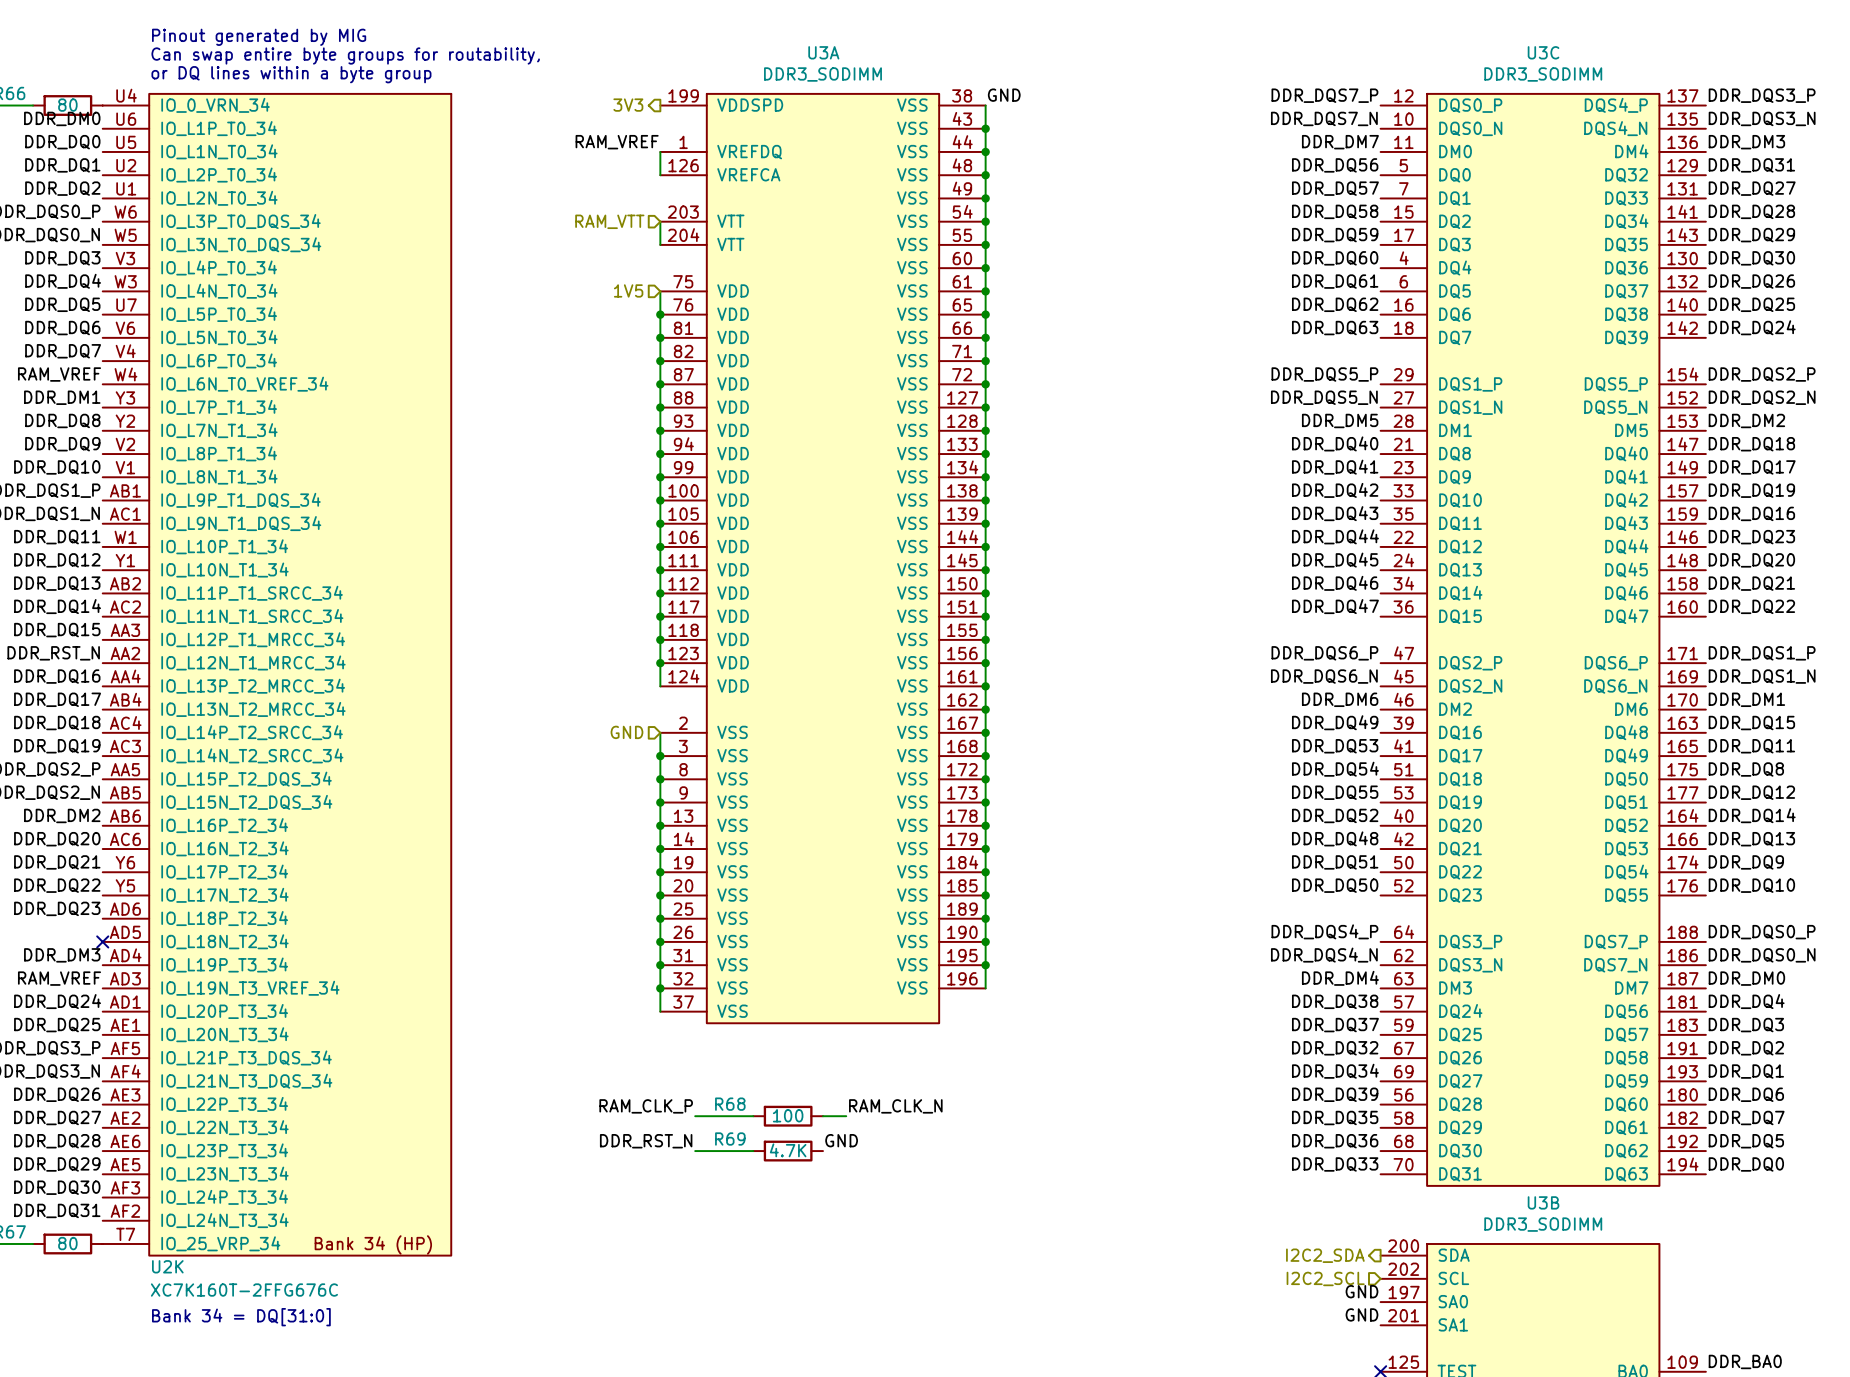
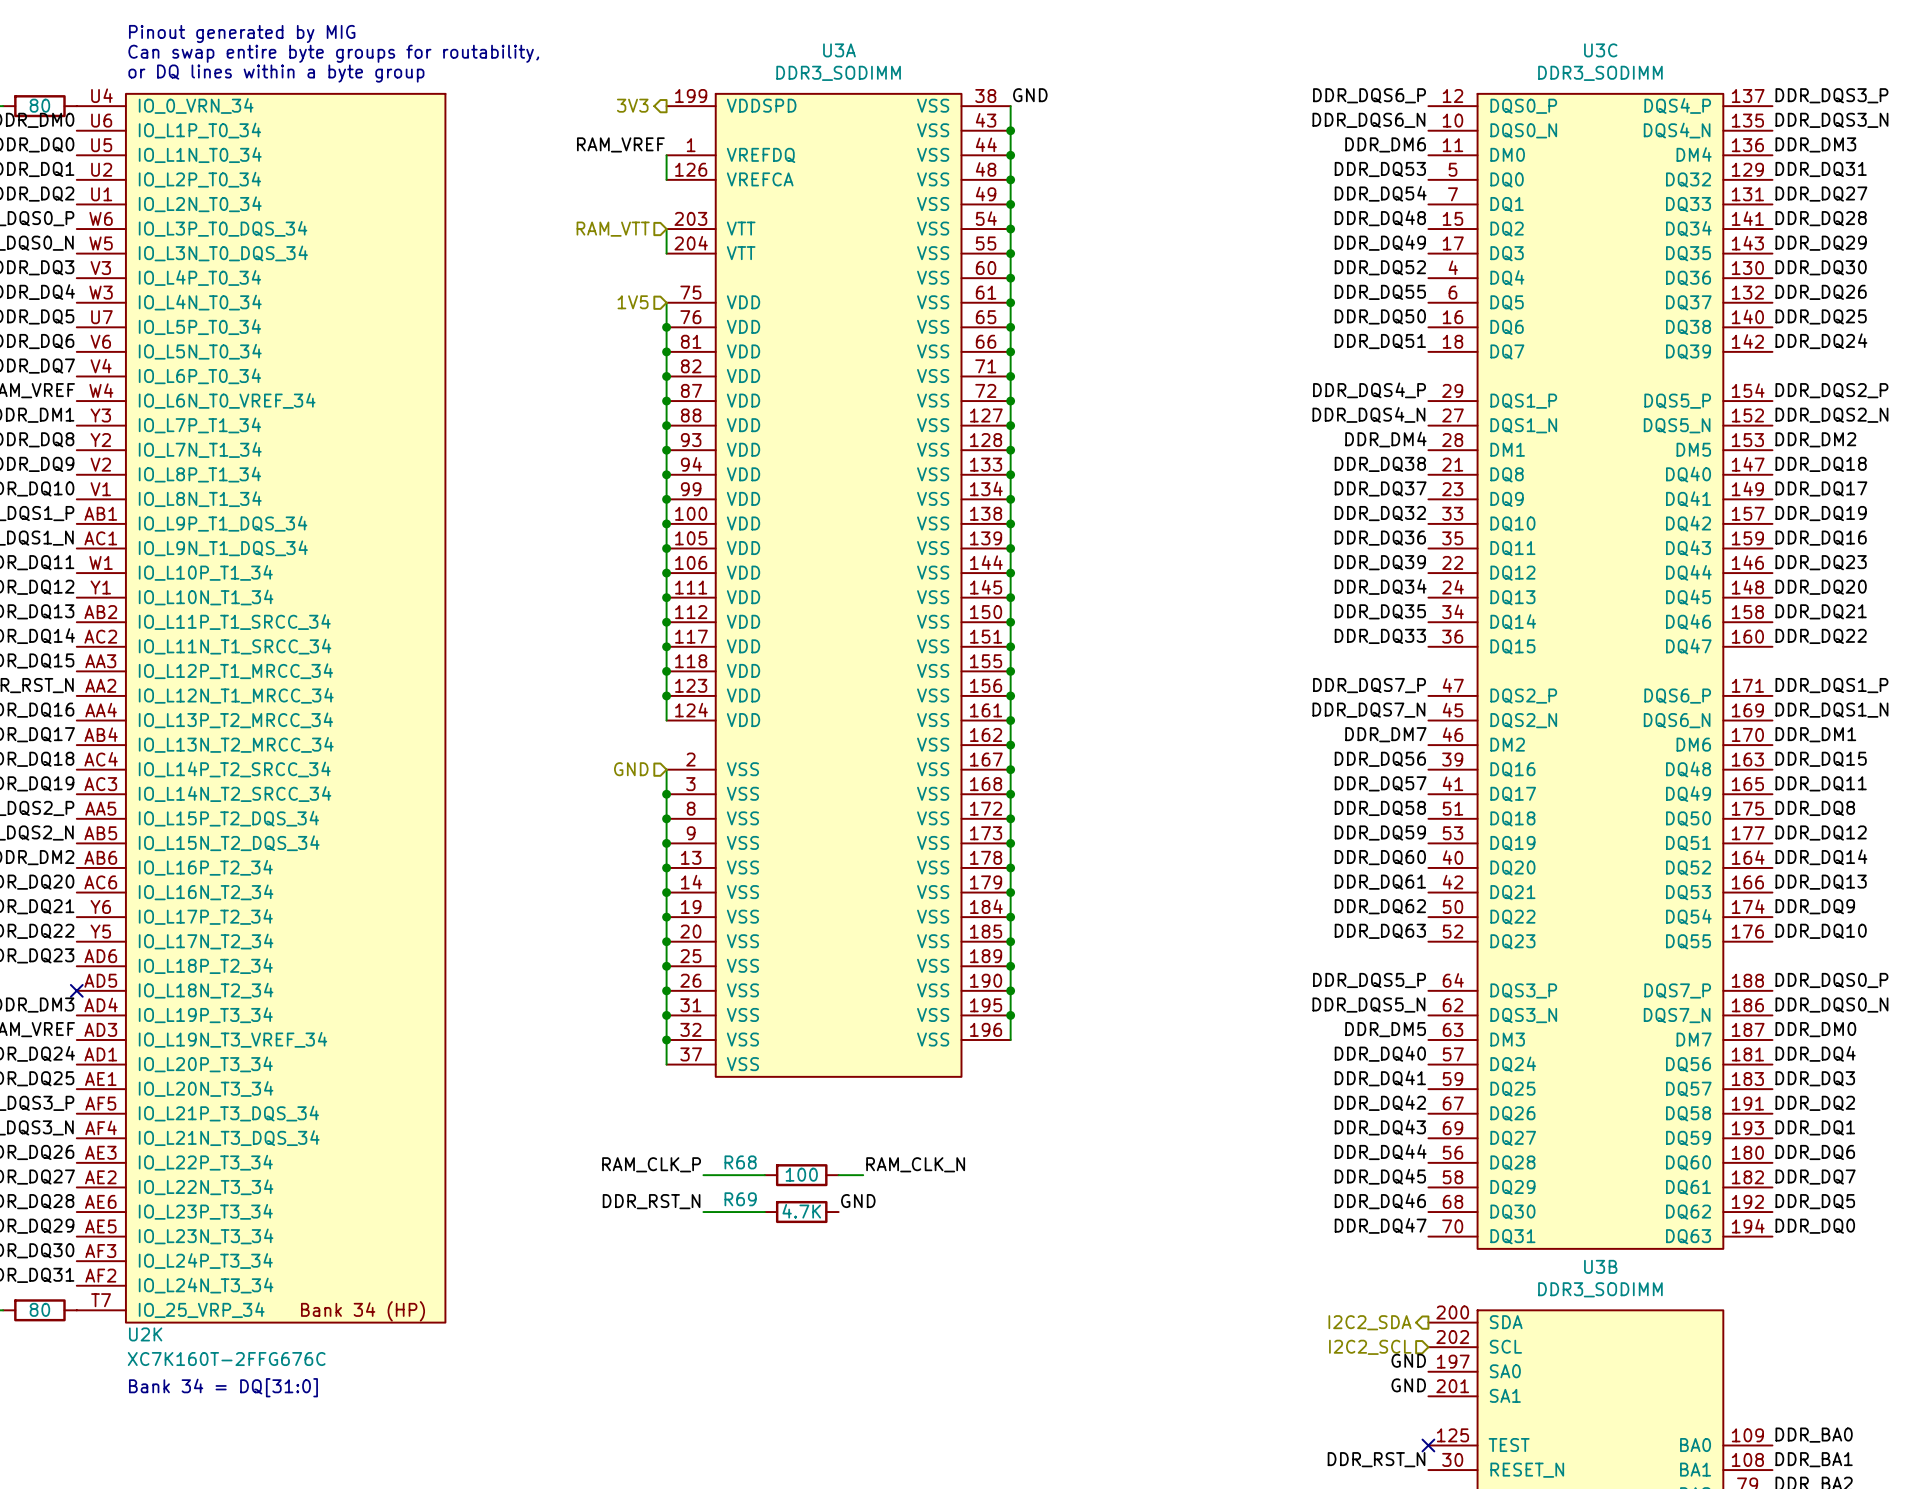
label: DDR_DQS7_P (1324, 95) -> DDR_DQS6_P (1369, 95)
label: DDR_DQS7_N (1324, 118) -> DDR_DQS6_N (1368, 120)
label: DDR_DM7 (1340, 142) -> DDR_DM6 (1385, 144)
label: DDR_DQ56 (1335, 165) -> DDR_DQ53 (1380, 169)
label: DDR_DQ57 (1335, 188) -> DDR_DQ54 (1380, 193)
label: DDR_DQ58 (1335, 211) -> DDR_DQ48 (1380, 218)
label: DDR_DQ59 (1335, 235) -> DDR_DQ49 (1380, 242)
label: DDR_DQ60 (1335, 258) -> DDR_DQ52 (1380, 267)
label: DDR_DQ61 (1335, 281) -> DDR_DQ55 (1380, 292)
label: DDR_DQ62 (1335, 304) -> DDR_DQ50 (1380, 316)
label: DDR_DQ63 (1335, 328) -> DDR_DQ51 (1380, 341)
label: DDR_DQS5_P (1324, 374) -> DDR_DQS4_P (1369, 390)
label: DDR_DQS5_N (1324, 397) -> DDR_DQS4_N (1368, 414)
label: DDR_DM5 (1340, 420) -> DDR_DM4 (1385, 439)
label: DDR_DQ40 (1335, 443) -> DDR_DQ38 (1380, 464)
label: DDR_DQ41 (1335, 467) -> DDR_DQ37 (1380, 488)
label: DDR_DQ42 (1335, 490) -> DDR_DQ32 (1380, 513)
label: DDR_DQ43 (1335, 513) -> DDR_DQ36 (1380, 538)
label: DDR_DQ44 (1335, 536) -> DDR_DQ39 (1380, 562)
label: DDR_DQ45 (1335, 560) -> DDR_DQ34 (1380, 586)
label: DDR_DQ46 (1335, 583) -> DDR_DQ35 (1380, 611)
label: DDR_DQ47 (1335, 606) -> DDR_DQ33 (1380, 636)
label: DDR_DQS6_P (1324, 653) -> DDR_DQS7_P (1369, 685)
label: DDR_DQS6_N (1324, 676) -> DDR_DQS7_N (1368, 710)
label: DDR_DM6 (1340, 699) -> DDR_DM7 (1385, 734)
label: DDR_DQ49 (1335, 722) -> DDR_DQ56 (1380, 759)
label: DDR_DQ53 (1335, 746) -> DDR_DQ57 (1380, 783)
label: DDR_DQ54 (1335, 769) -> DDR_DQ58 (1380, 808)
label: DDR_DQ55 (1335, 792) -> DDR_DQ59 (1380, 833)
label: DDR_DQ52 (1335, 815) -> DDR_DQ60 (1380, 857)
label: DDR_DQ48 (1335, 838) -> DDR_DQ61 (1380, 882)
label: DDR_DQ51 (1335, 862) -> DDR_DQ62 (1380, 906)
label: DDR_DQ50 (1335, 885) -> DDR_DQ63 (1380, 931)
label: DDR_DQS4_P (1324, 931) -> DDR_DQS5_P (1369, 980)
label: DDR_DQS4_N (1324, 955) -> DDR_DQS5_N (1368, 1005)
label: DDR_DM4 (1340, 978) -> DDR_DM5 (1385, 1029)
label: DDR_DQ38 (1335, 1001) -> DDR_DQ40 (1380, 1053)
label: DDR_DQ37 (1335, 1025) -> DDR_DQ41 (1380, 1078)
label: DDR_DQ32 (1335, 1048) -> DDR_DQ42 (1380, 1103)
label: DDR_DQ34 (1335, 1071) -> DDR_DQ43 (1380, 1127)
label: DDR_DQ39 (1335, 1094) -> DDR_DQ44 (1380, 1152)
label: DDR_DQ35 (1335, 1118) -> DDR_DQ45 (1380, 1176)
label: DDR_DQ36 (1335, 1141) -> DDR_DQ46 (1380, 1201)
label: DDR_DQ33 (1335, 1164) -> DDR_DQ47 (1380, 1225)

